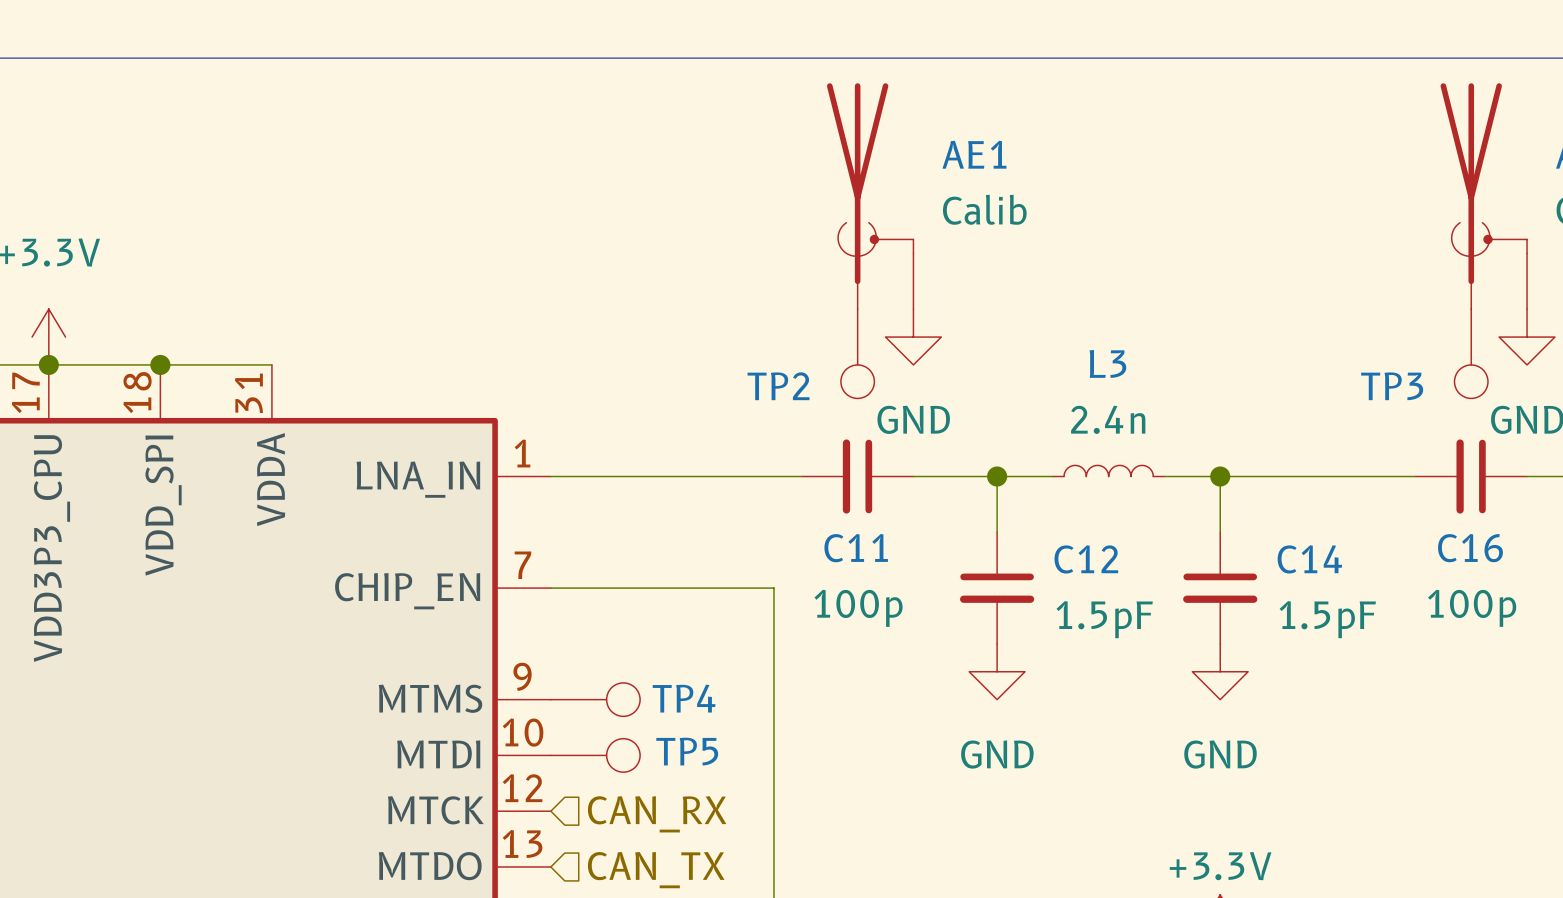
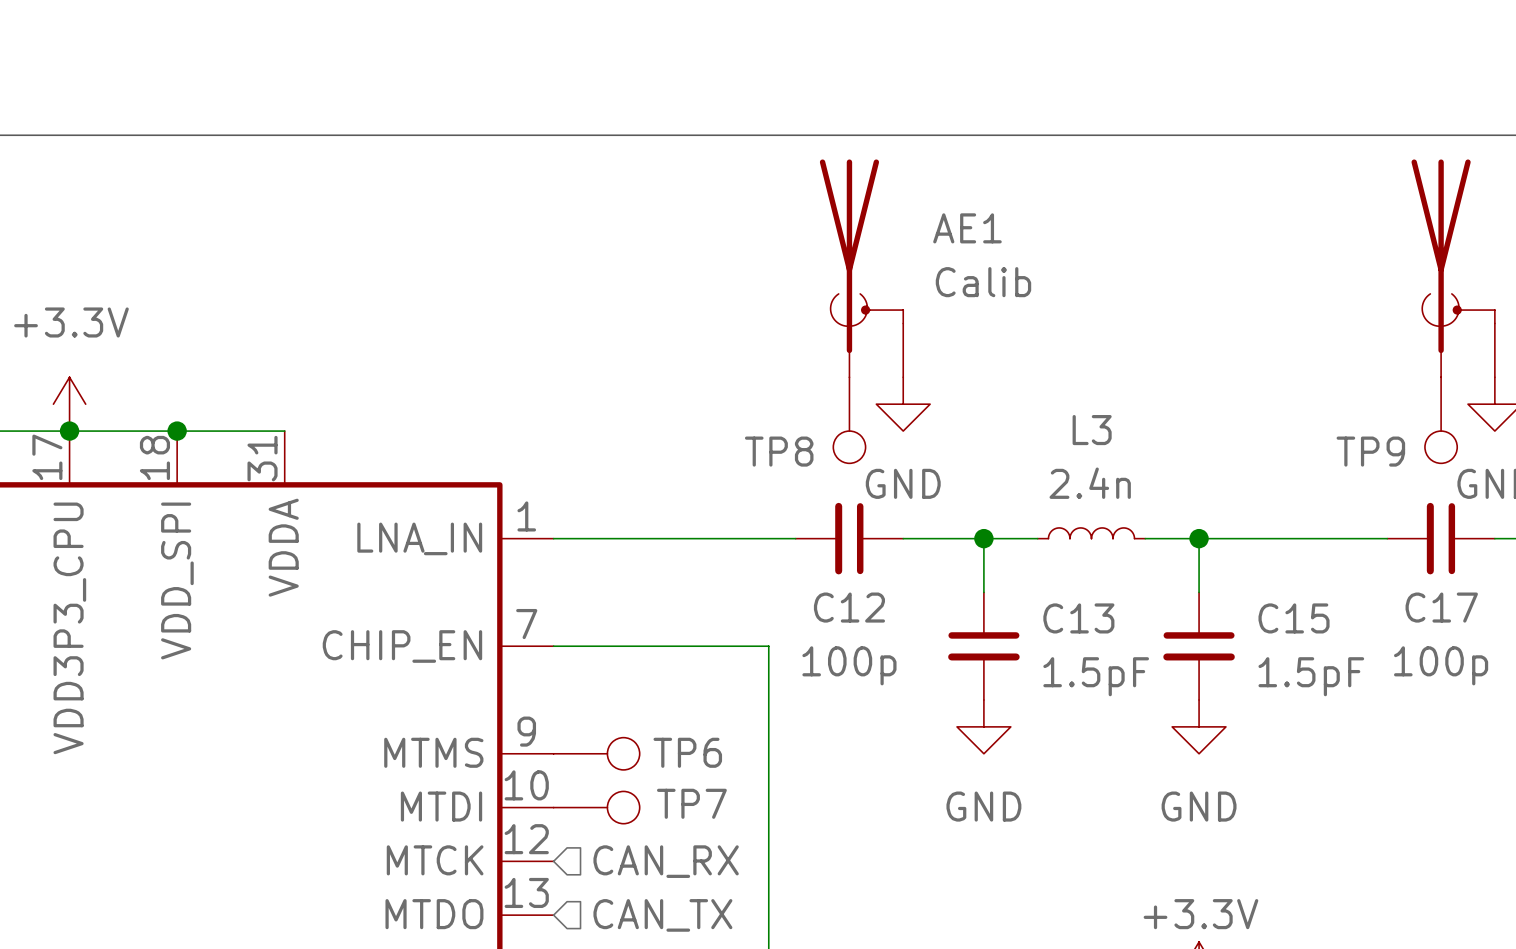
TP2 name: TP2 (778, 386) -> TP8 (779, 451)
TP3 name: TP3 (1392, 386) -> TP9 (1370, 451)
C11 name: C11 (856, 548) -> C12 (849, 607)
C16 name: C16 (1470, 548) -> C17 (1441, 607)
C12 name: C12 (1086, 559) -> C13 (1078, 618)
C14 name: C14 (1309, 559) -> C15 (1294, 618)
TP4 name: TP4 (684, 698) -> TP6 (687, 752)
TP5 name: TP5 (687, 751) -> TP7 (691, 803)

